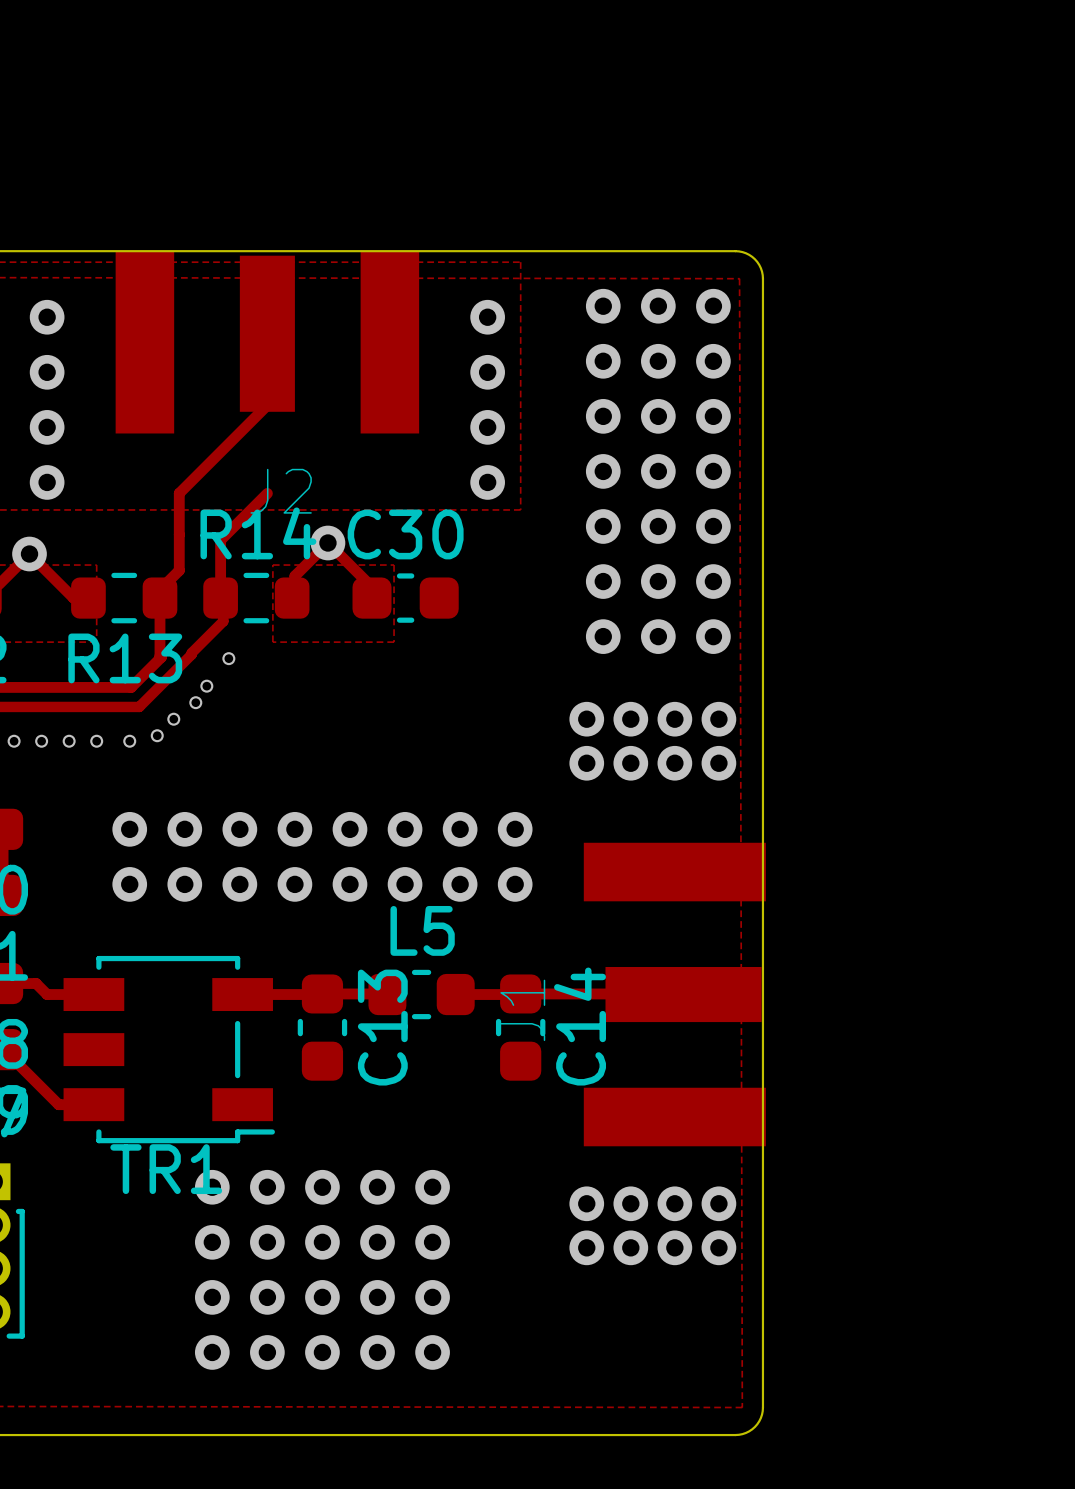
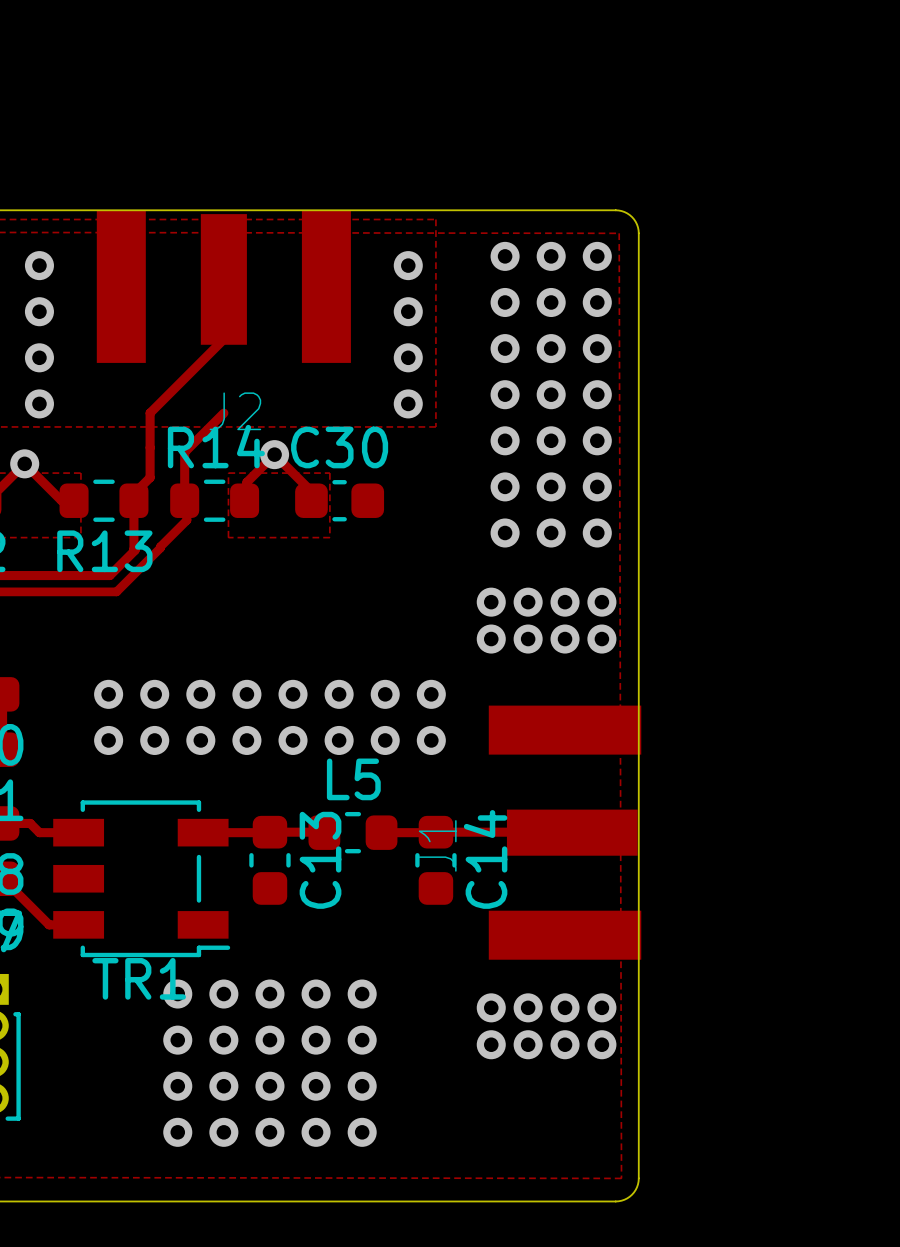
via: (228, 658) -> none
via: (206, 686) -> none
via: (195, 702) -> none
via: (173, 719) -> none
via: (157, 735) -> none
via: (14, 741) -> none
via: (41, 741) -> none
via: (69, 741) -> none
via: (96, 741) -> none
via: (129, 741) -> none

